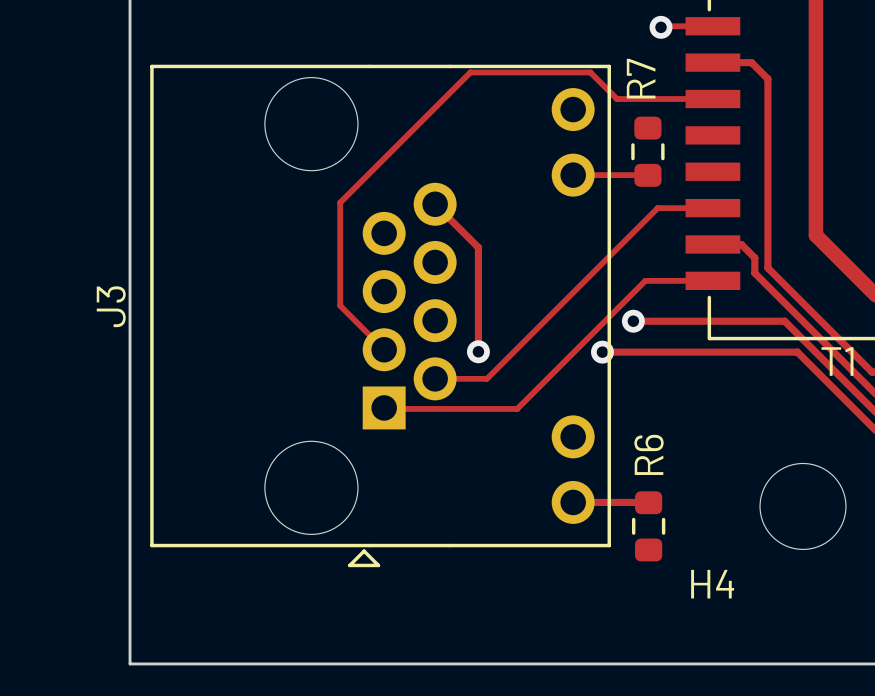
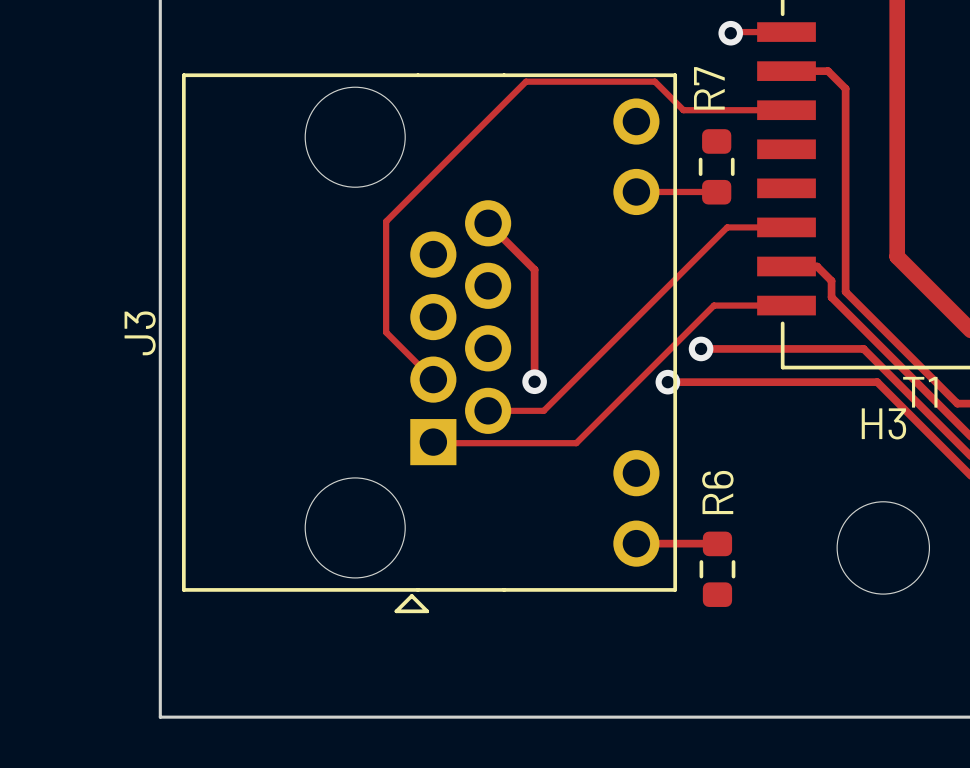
H4 name: H4 (712, 584) -> H3 (883, 423)

